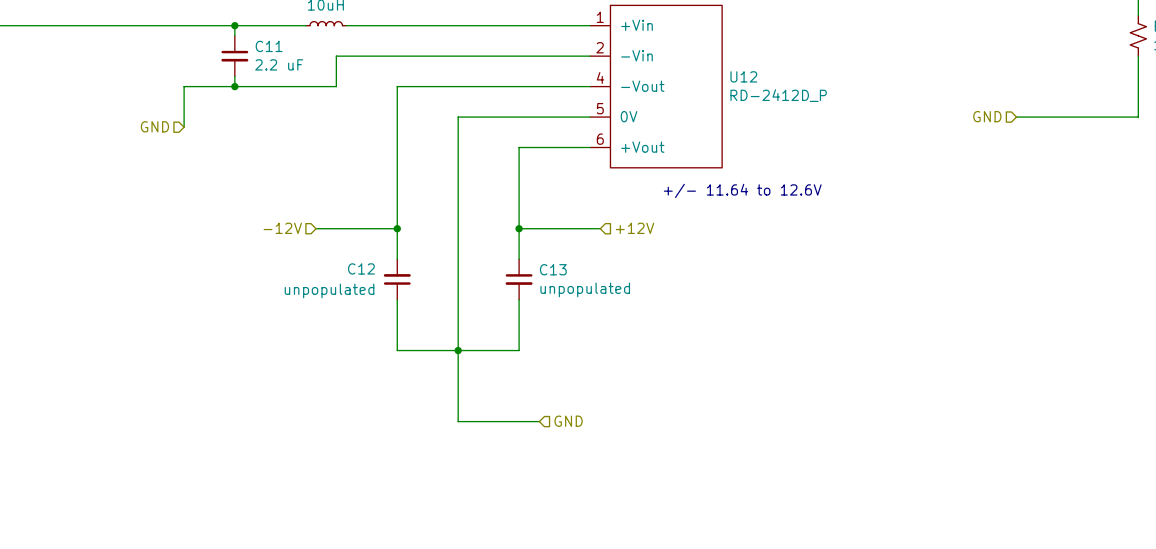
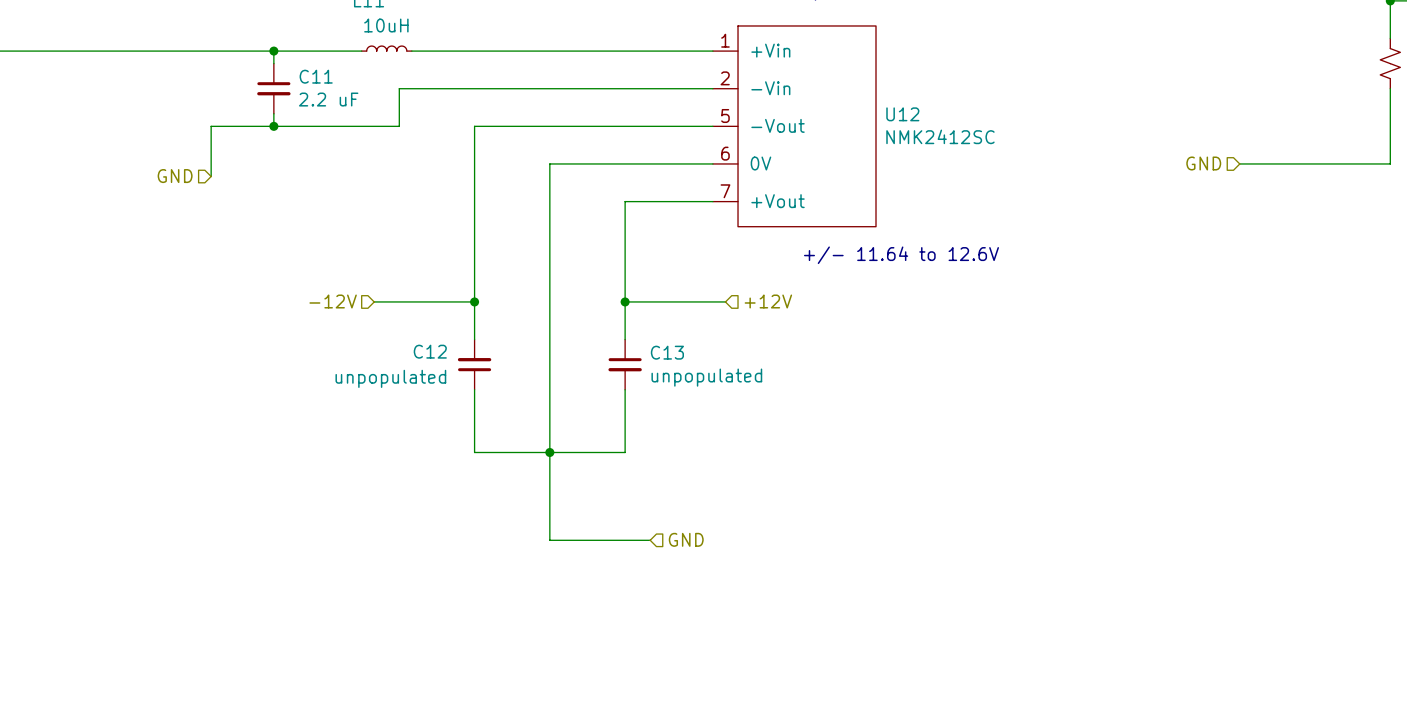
U12 pin number: 4 (600, 77) -> 5 (725, 116)
U12 value: RD-2412D_P (778, 95) -> NMK2412SC (940, 136)
U12 pin number: 5 (600, 108) -> 6 (725, 153)
U12 pin number: 6 (600, 139) -> 7 (725, 191)

